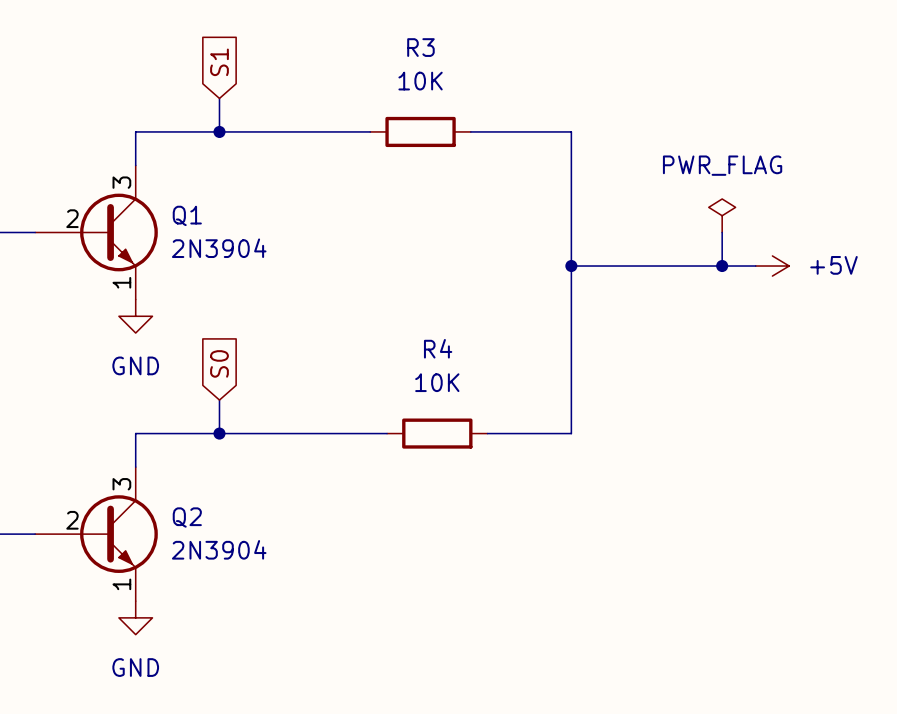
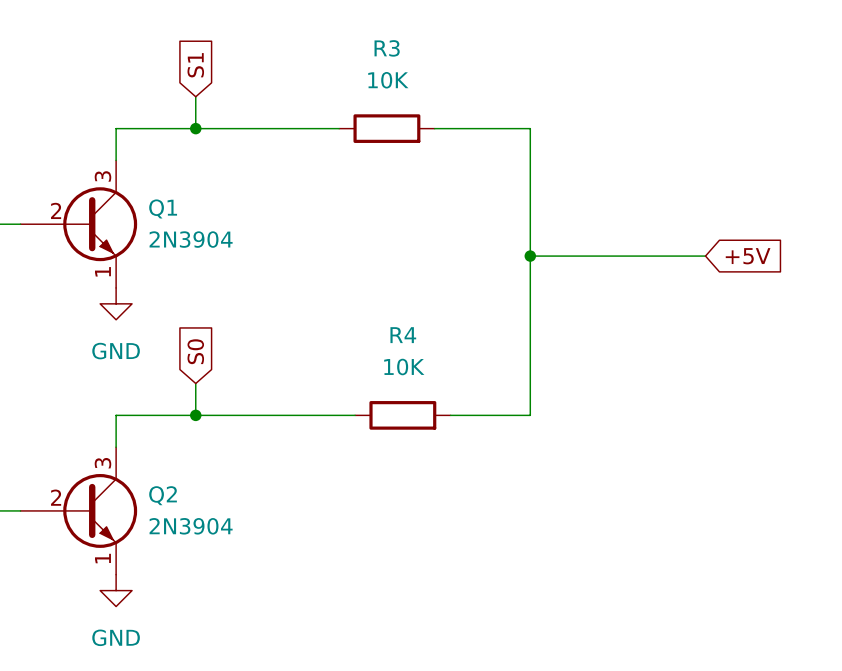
power symbol: PWR_FLAG (722, 215) -> none
wire: (722, 232) (722, 266) -> none
junction: (722, 266) -> none
power symbol: +5V (772, 266) -> none
global label: none -> +5V (748, 256)

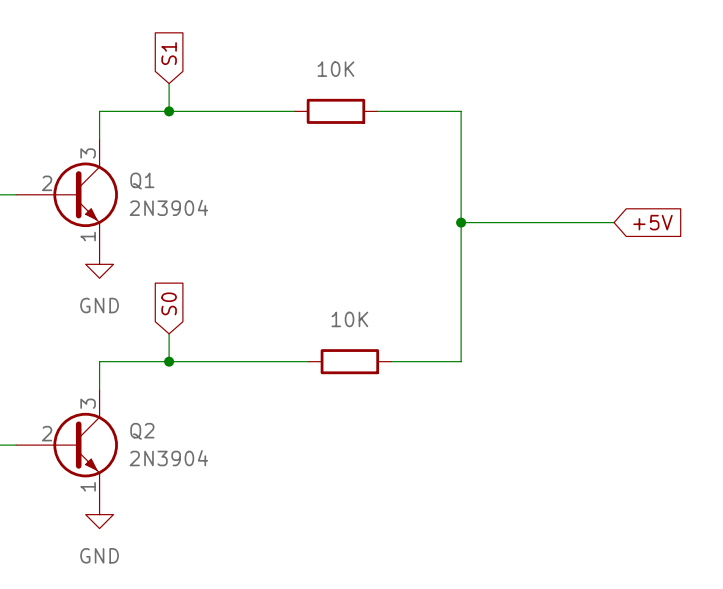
R3 name: R3 (387, 48) -> none
R4 name: R4 (403, 335) -> none

